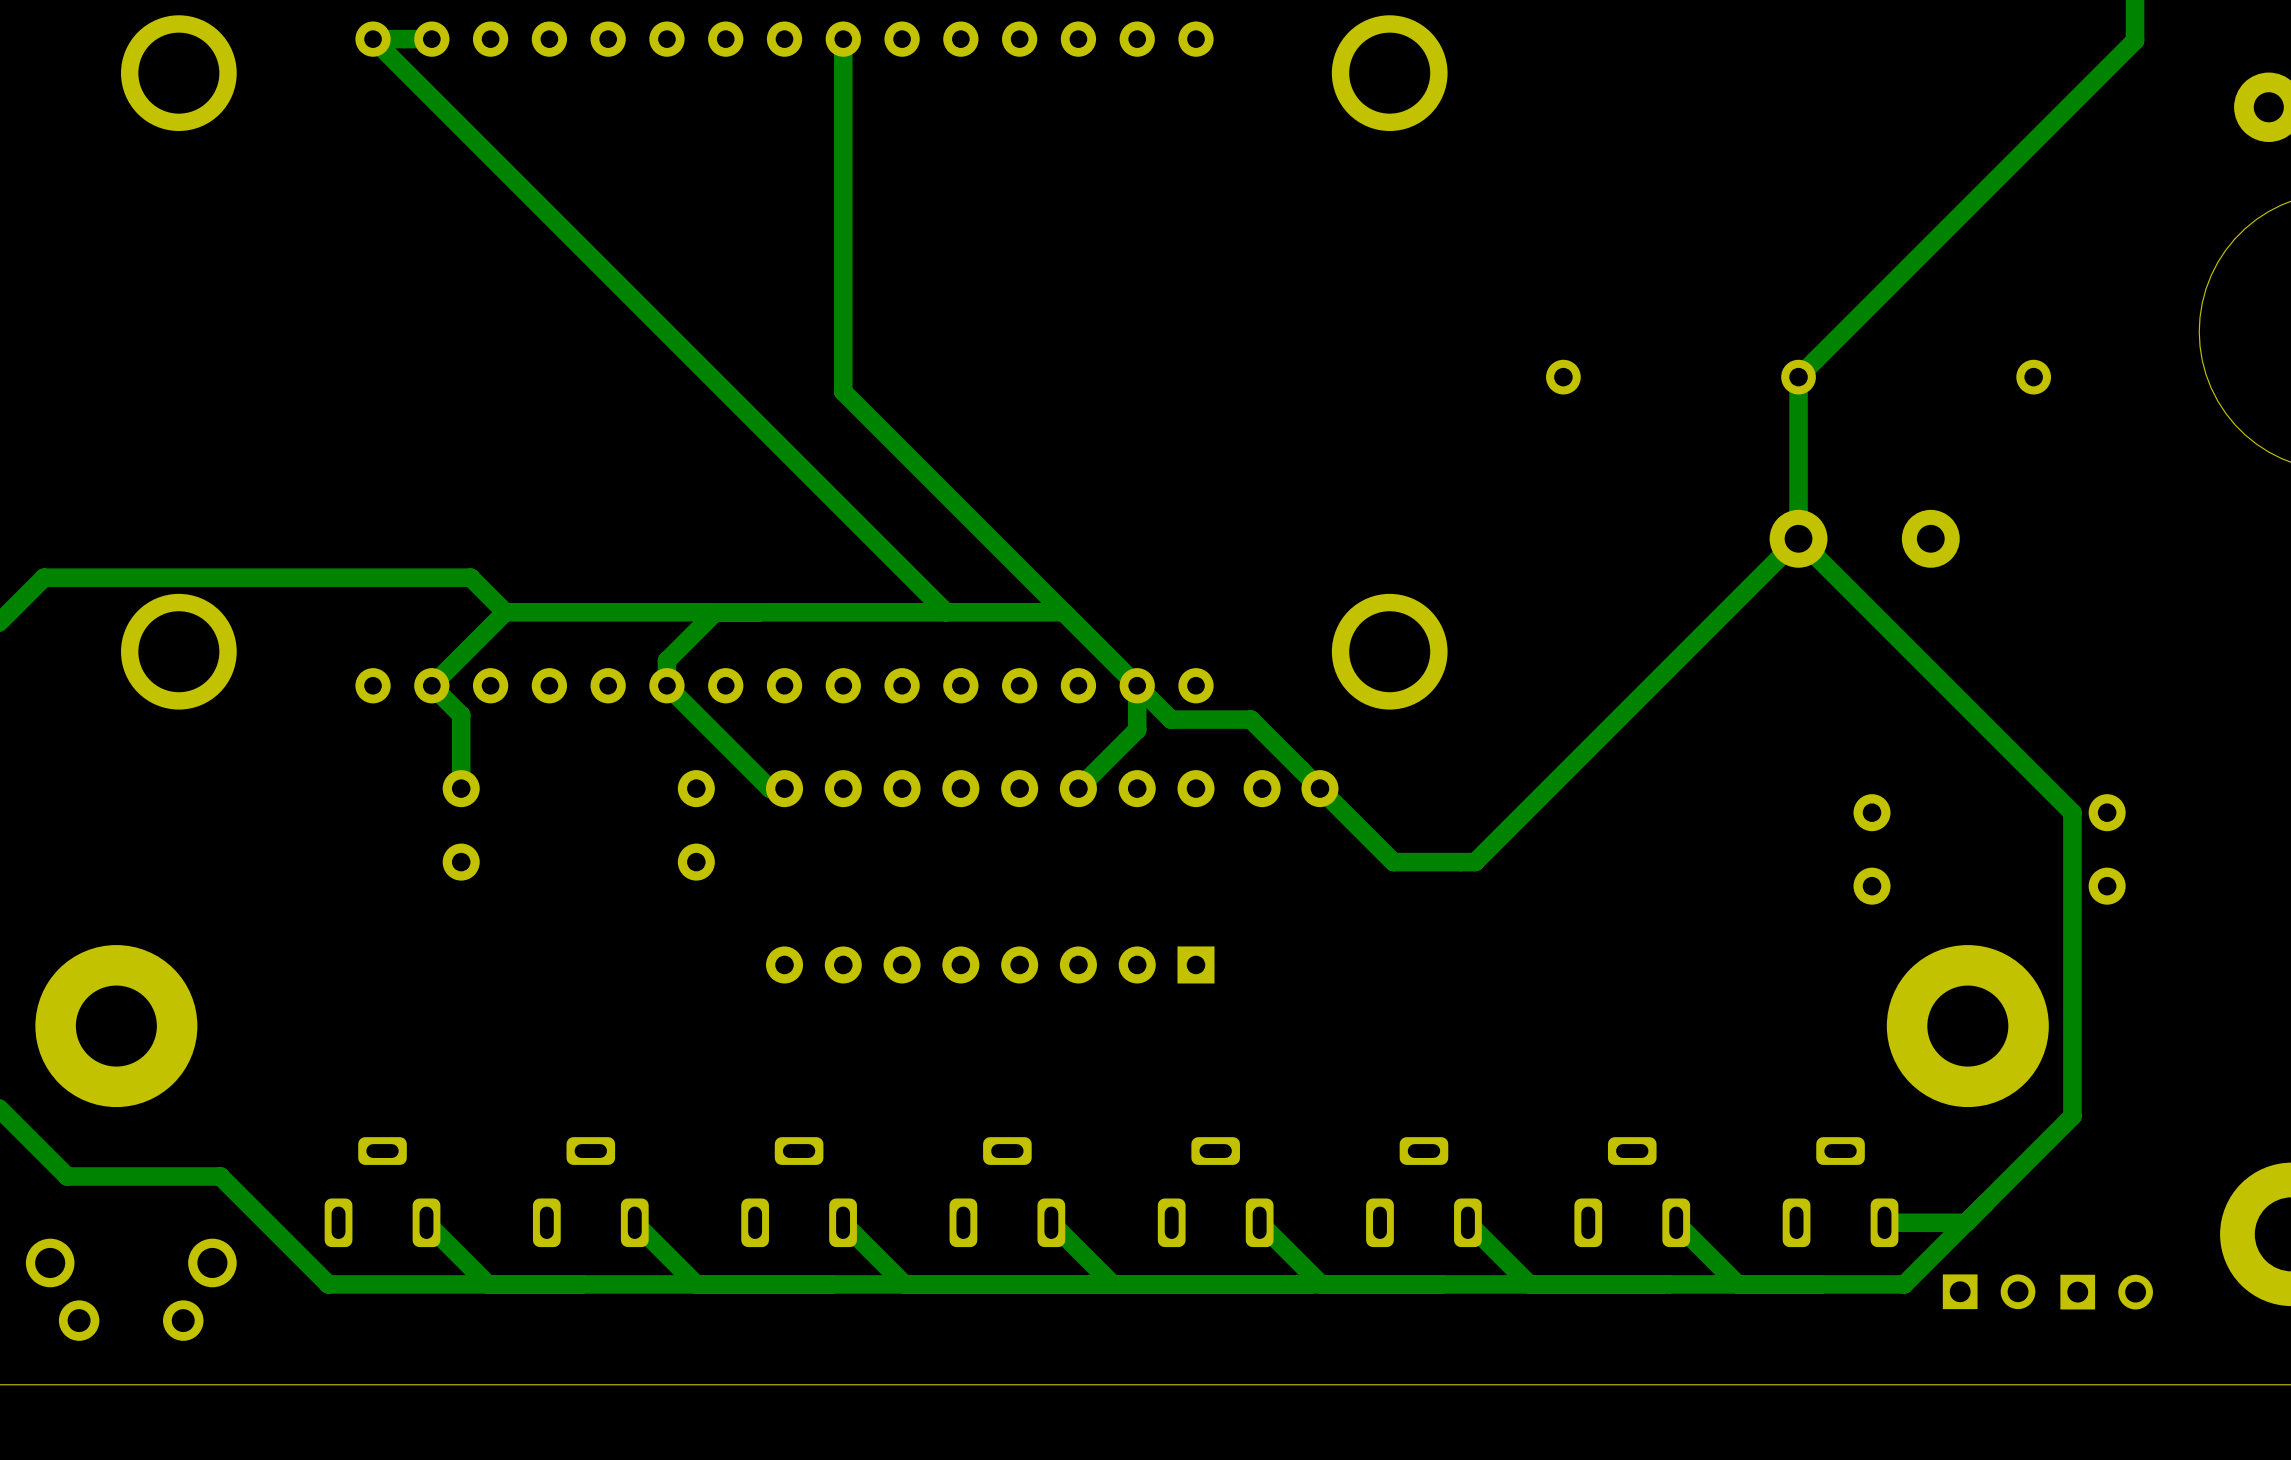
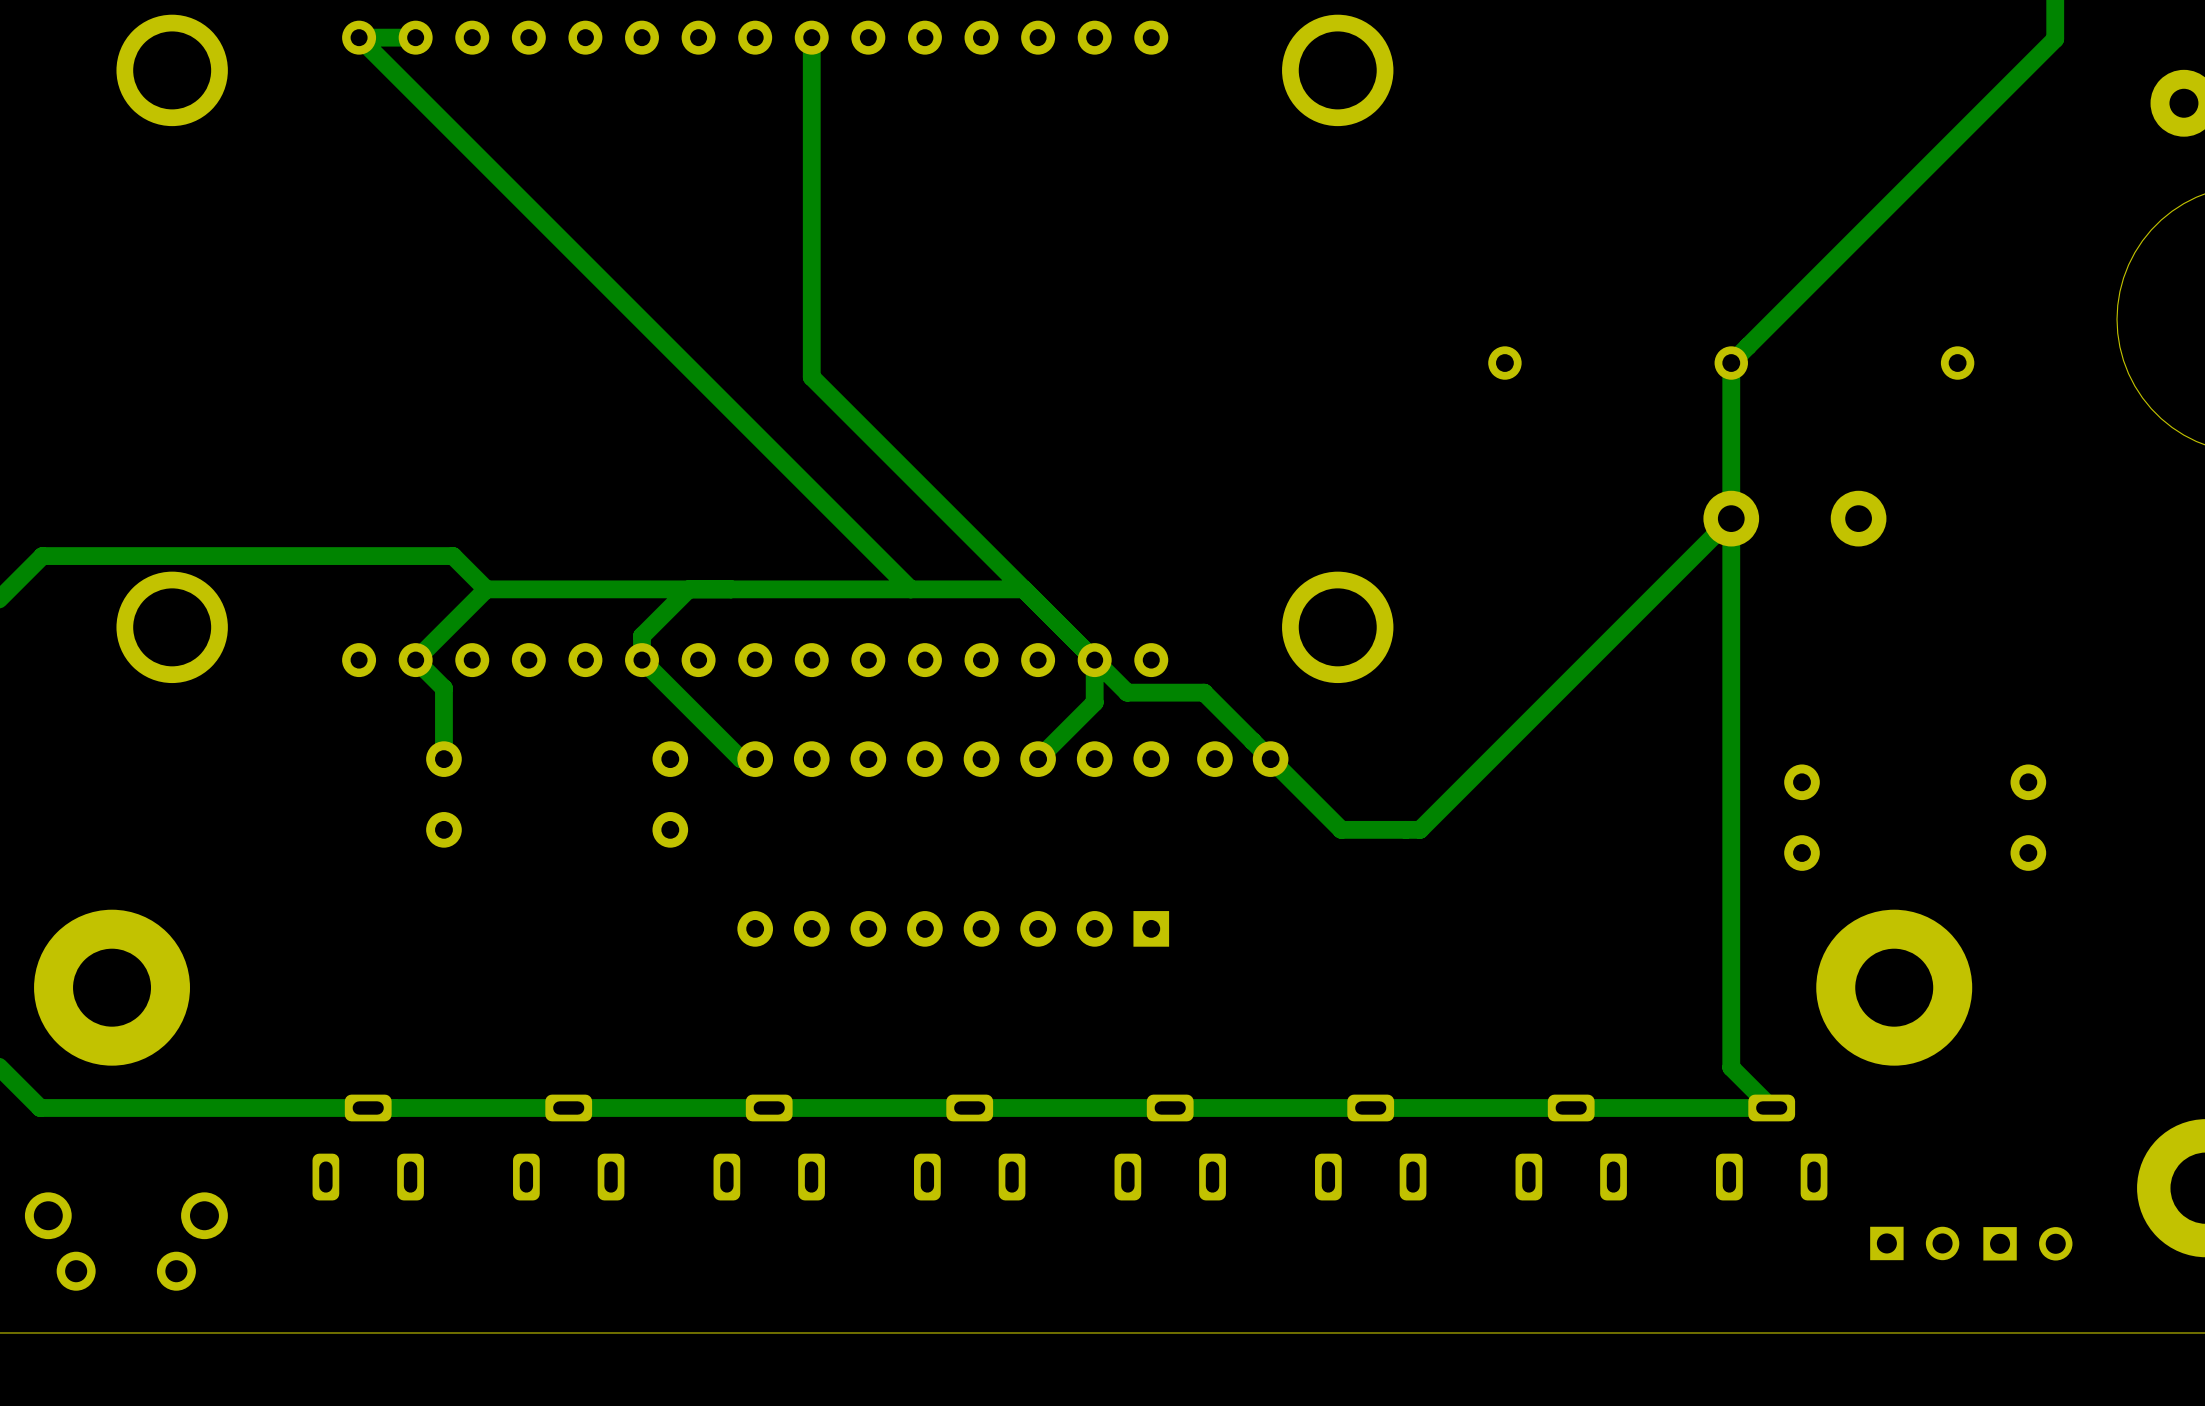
track: (1798, 538) (2072, 812) (2072, 1116) (1904, 1284) (328, 1284) (220, 1176) (67, 1176) (41, 1151) -> (1731, 520) (1731, 1067) (1771, 1107) (40, 1107)
track: (426, 1222) (488, 1284) -> none
track: (634, 1222) (696, 1284) -> none
track: (843, 1222) (904, 1284) -> none
track: (1051, 1222) (1112, 1284) -> none
track: (1259, 1222) (1321, 1284) -> none
track: (1467, 1222) (1529, 1284) -> none
track: (1676, 1222) (1737, 1284) -> none
track: (1965, 1222) (1884, 1222) -> none

